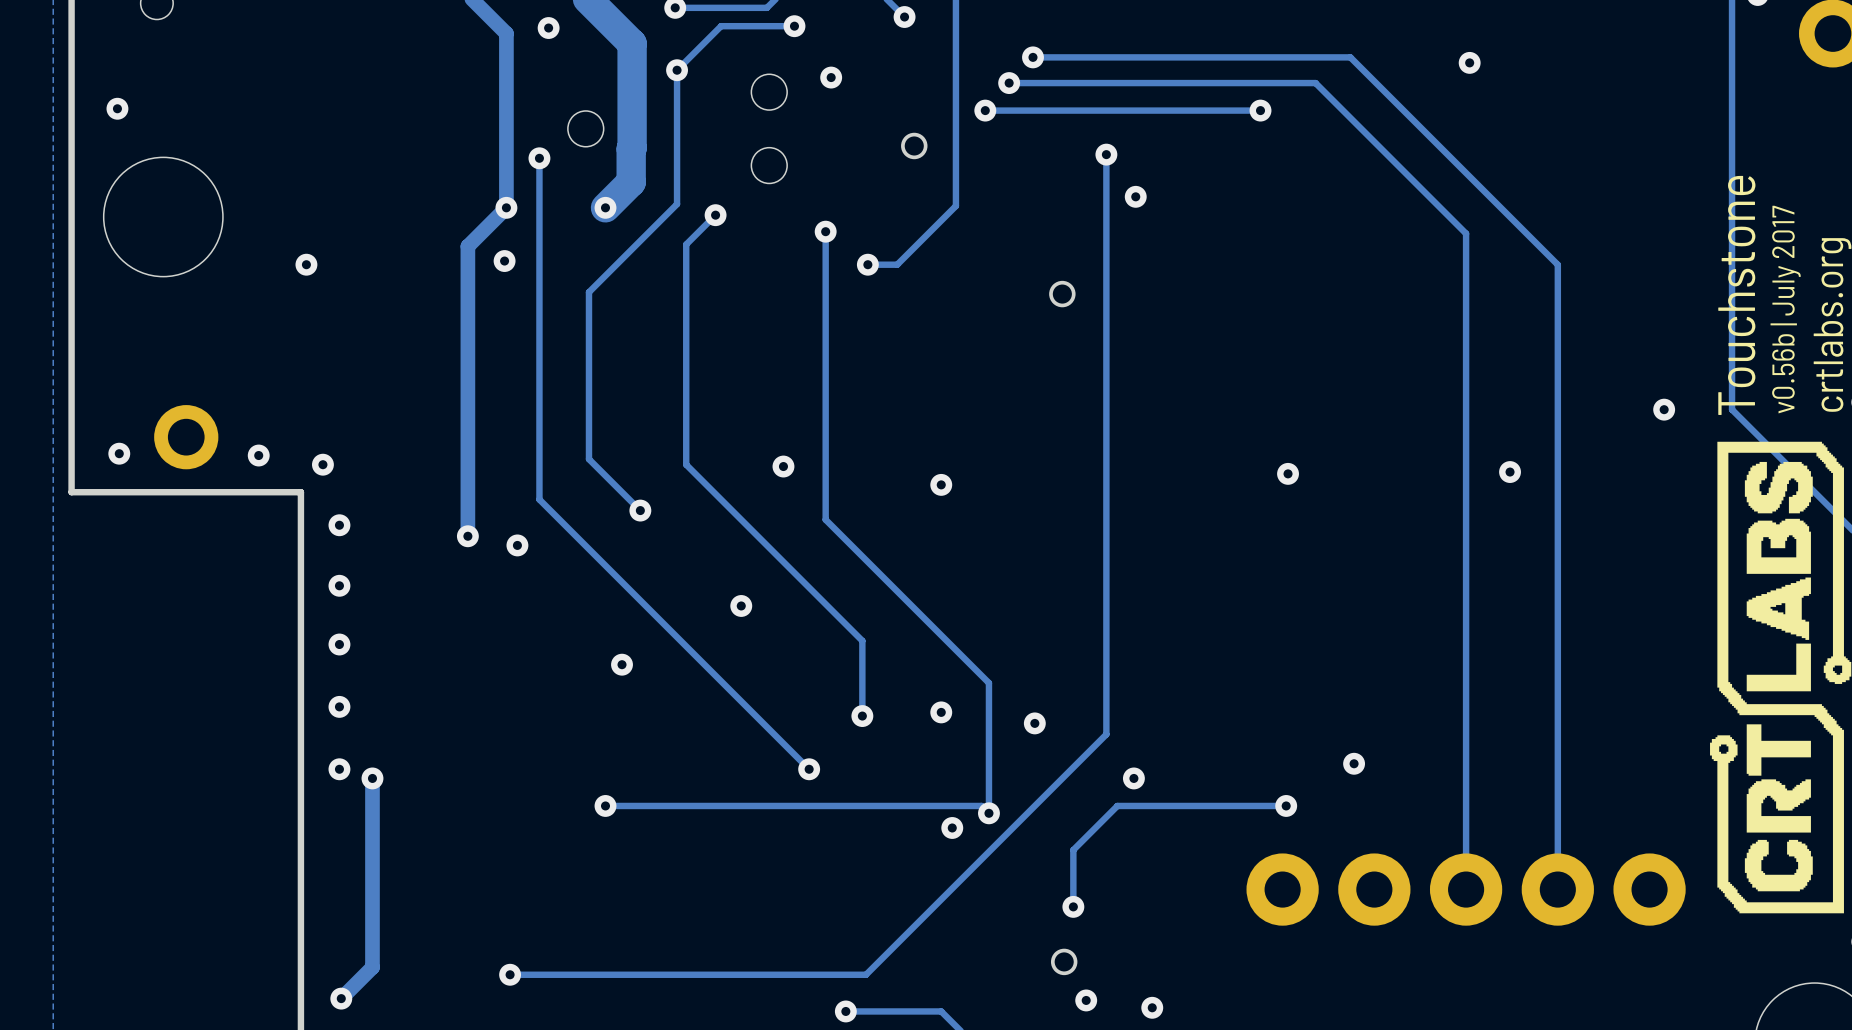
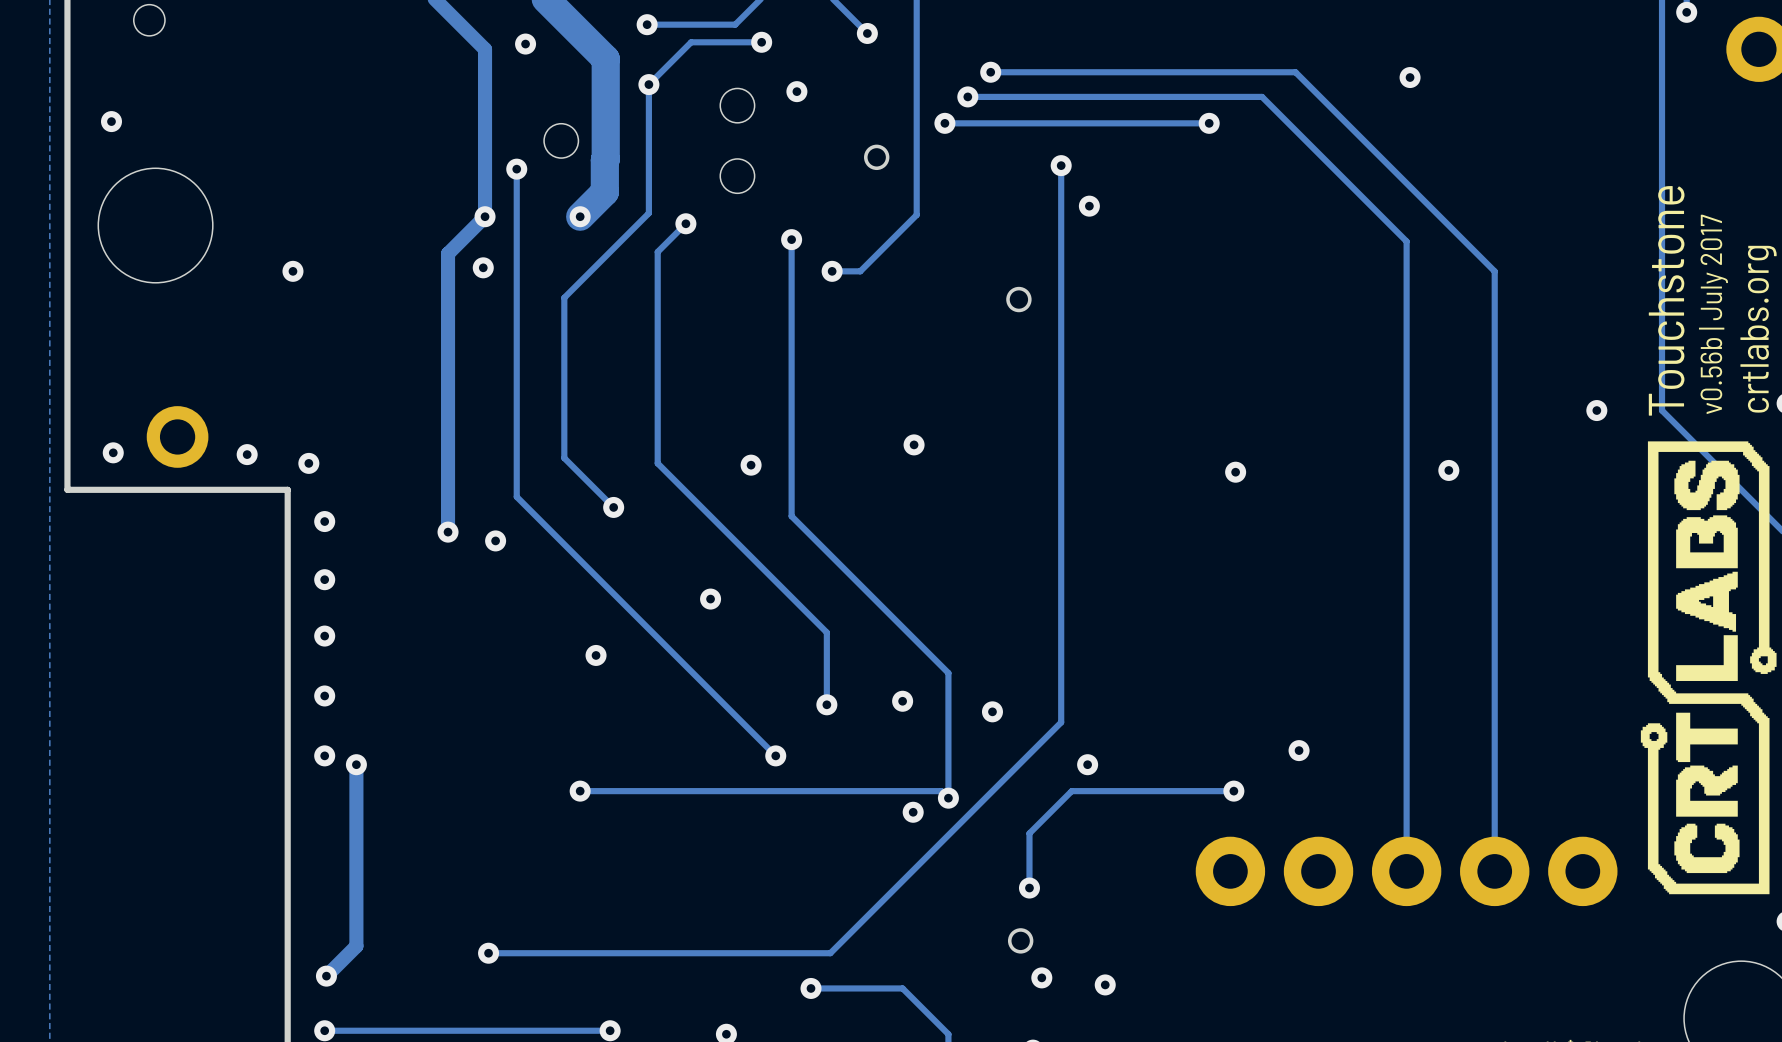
via position: (941, 484) -> (914, 444)

